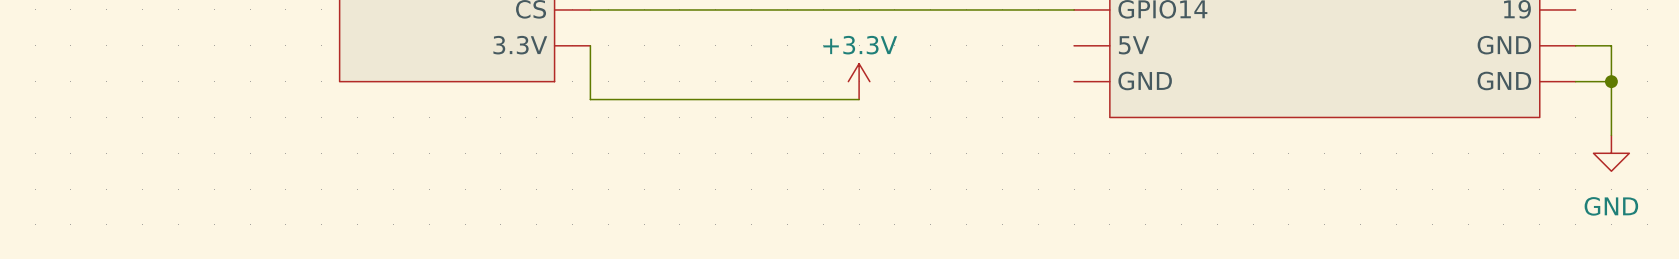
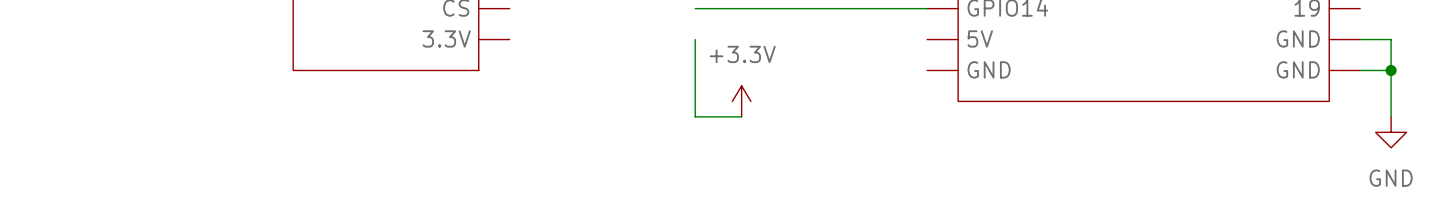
wire: (590, 9) (805, 9) -> none
wire: (590, 45) (590, 99) (859, 99) -> none
wire: none -> (695, 39) (695, 116) (741, 116)
power symbol text position: +3.3V (860, 45) -> +3.3V (742, 54)
power symbol position: +3.3V (859, 81) -> +3.3V (741, 101)

